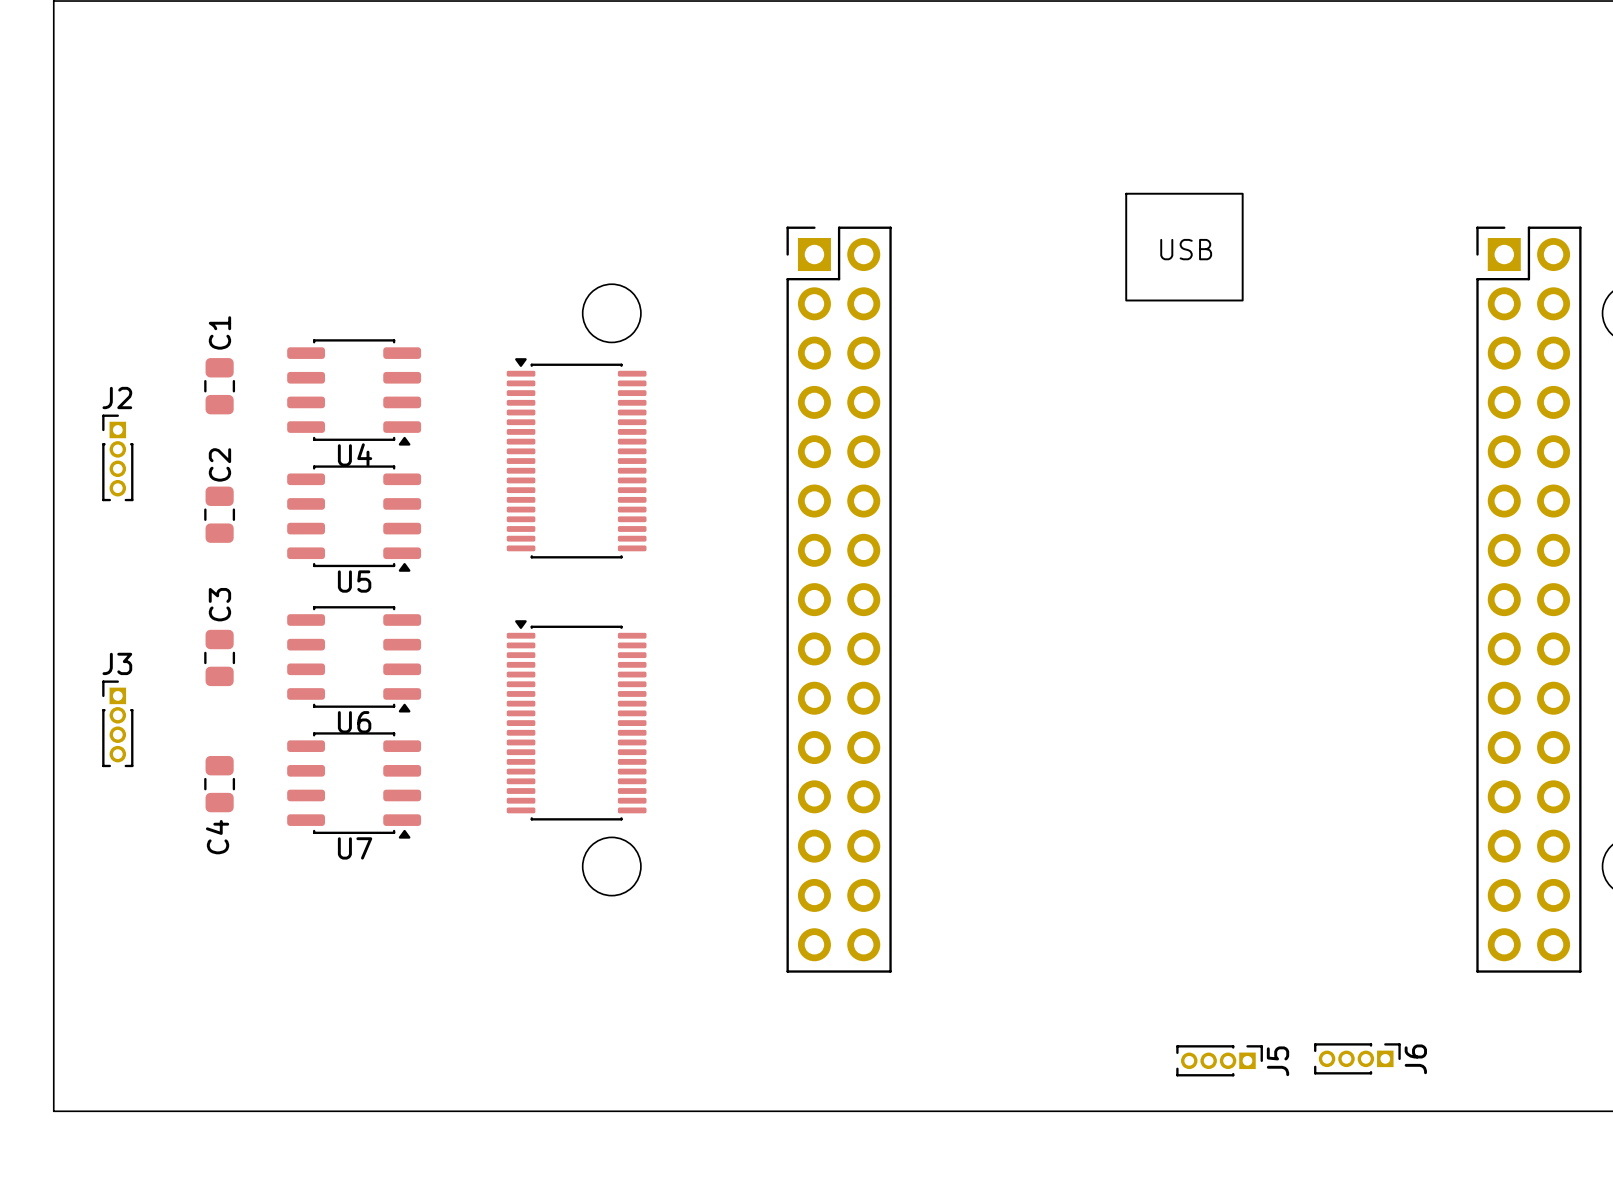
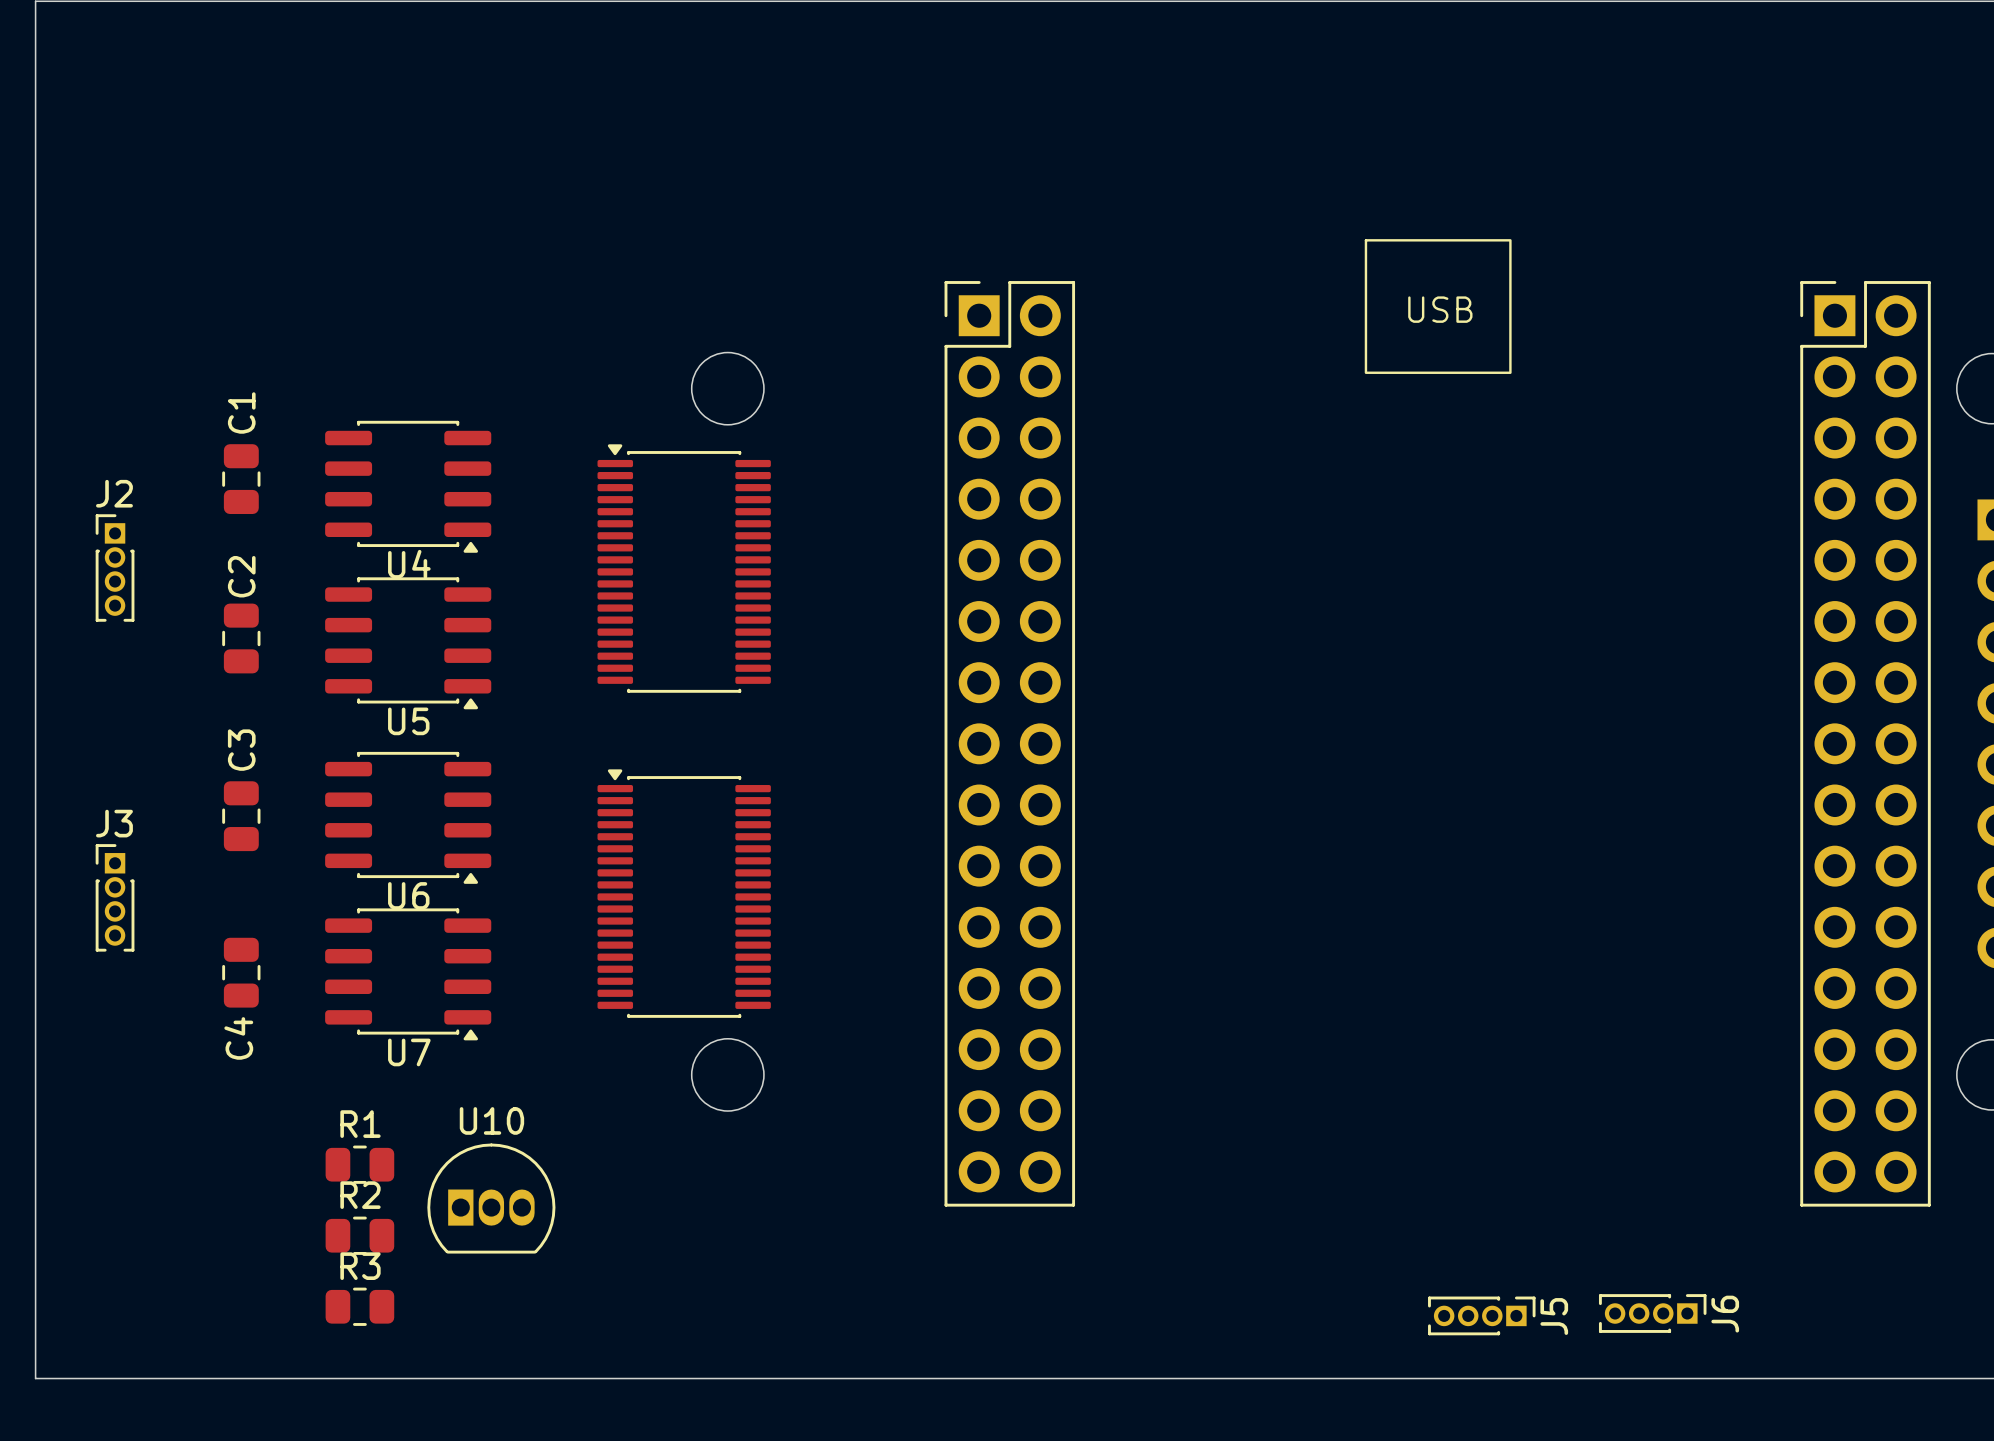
R1: none -> (359, 1164)
U10: none -> (491, 1198)
R2: none -> (359, 1235)
R3: none -> (359, 1306)

